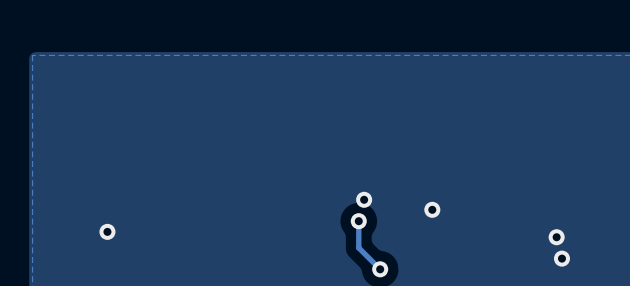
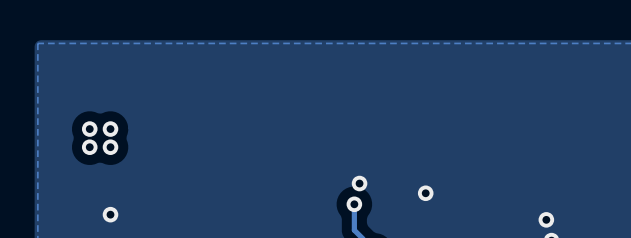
via: none -> (89, 129)
via: none -> (110, 129)
via: none -> (89, 147)
via: none -> (110, 147)

